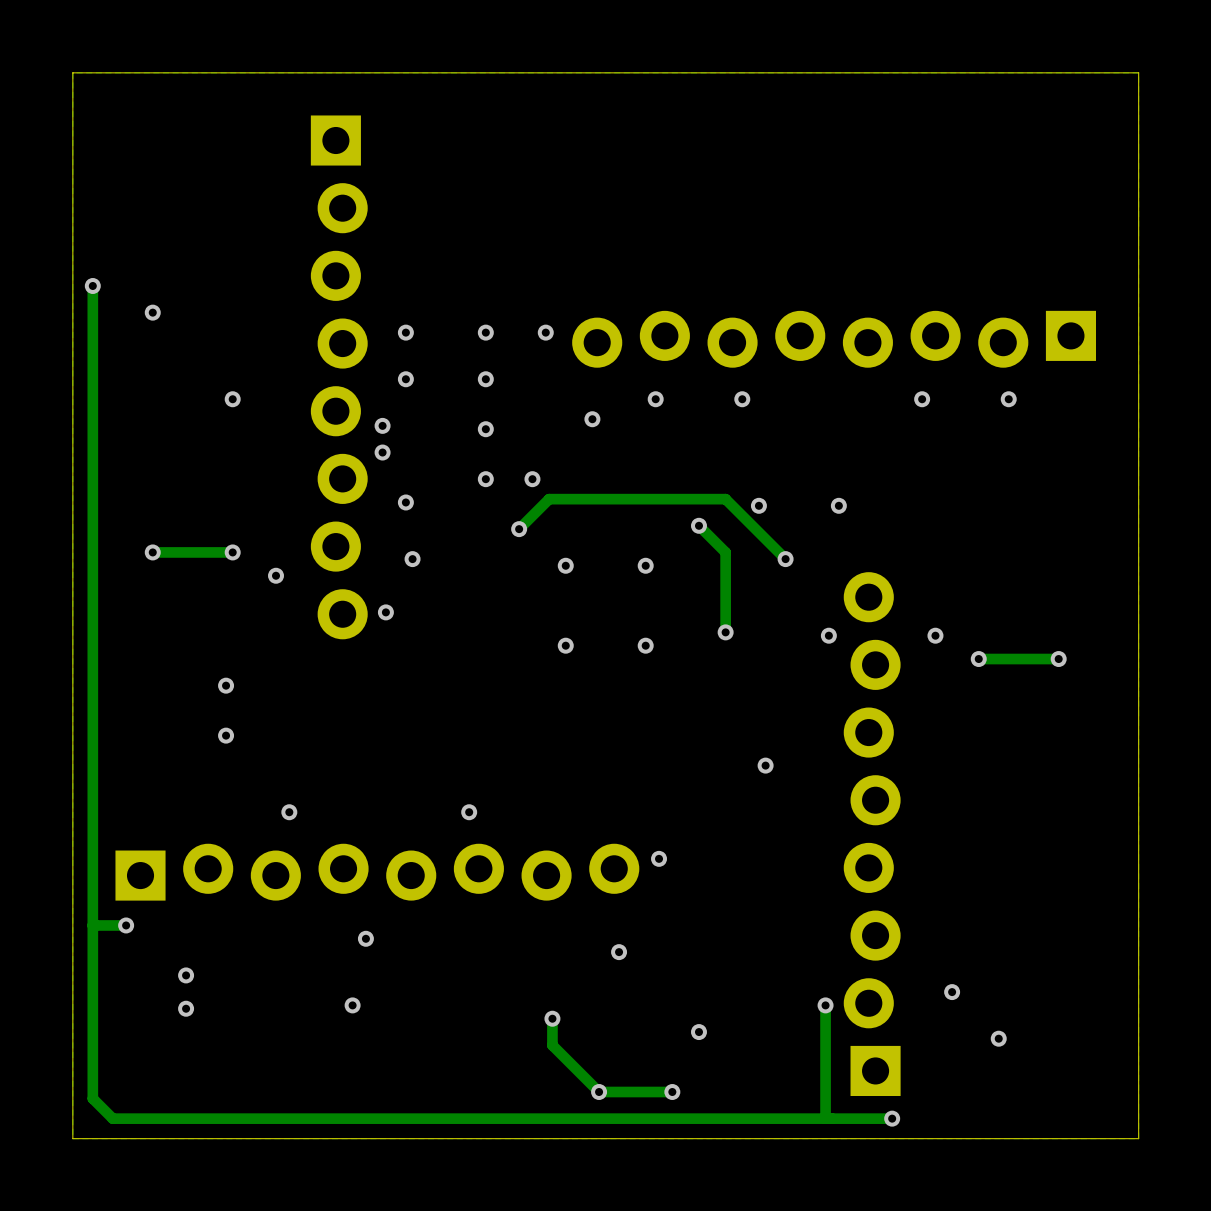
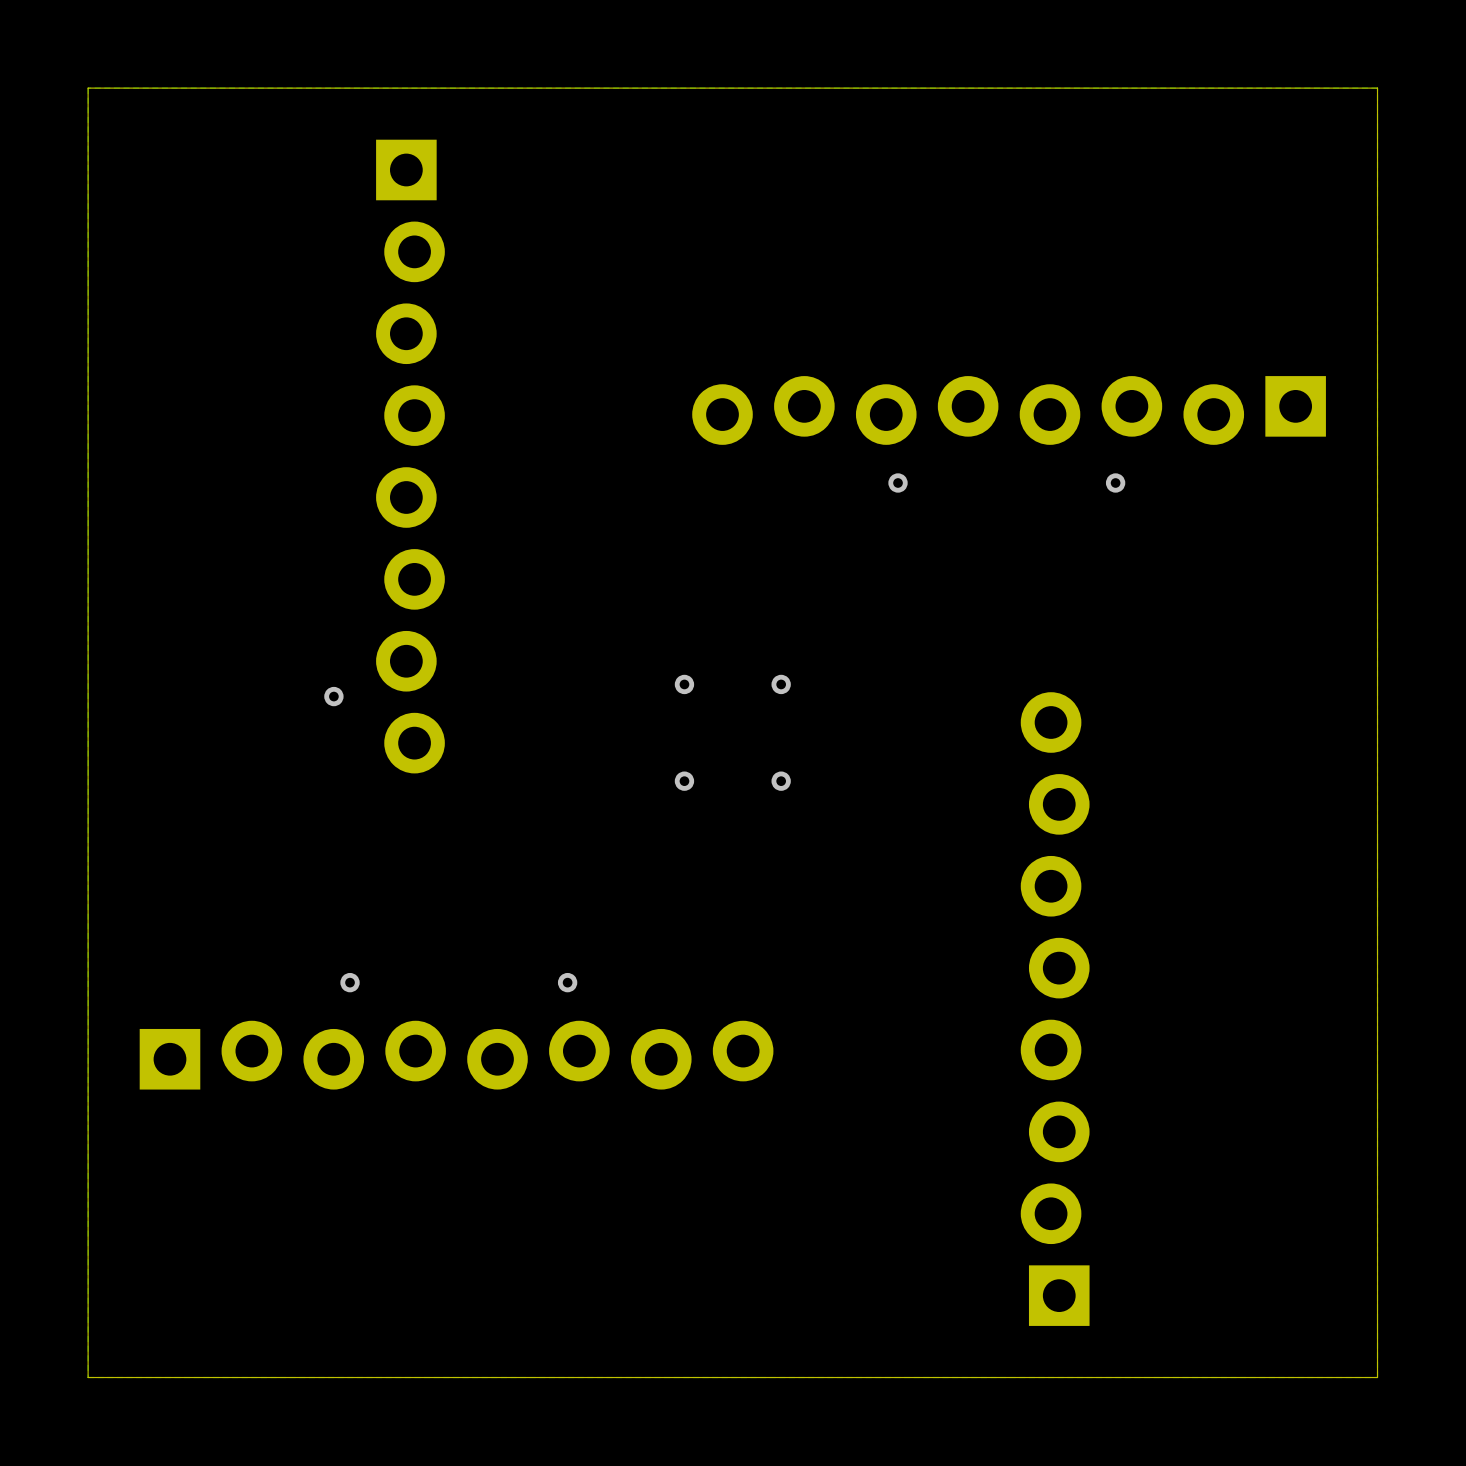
track: (92, 285) (92, 1098) (112, 1118) (892, 1118) -> none
via: (92, 285) -> none
via: (152, 312) -> none
via: (405, 332) -> none
via: (485, 332) -> none
via: (545, 332) -> none
via: (405, 379) -> none
via: (485, 379) -> none
via: (232, 399) -> none
via: (655, 399) -> none
via: (1008, 399) -> none
via: (592, 419) -> none
via: (382, 425) -> none
via: (485, 429) -> none
via: (382, 452) -> none
via: (485, 479) -> none
via: (532, 479) -> none
via: (405, 502) -> none
via: (758, 505) -> none
via: (838, 505) -> none
track: (698, 525) (725, 552) (725, 632) -> none
via: (698, 525) -> none
track: (519, 529) (549, 499) (725, 499) (785, 559) -> none
via: (519, 529) -> none
via: (152, 552) -> none
track: (232, 552) (152, 552) -> none
via: (232, 552) -> none
via: (412, 559) -> none
via: (785, 559) -> none
via: (385, 612) -> none
via: (725, 632) -> none
via: (828, 635) -> none
via: (935, 635) -> none
via: (978, 659) -> none
track: (1058, 659) (978, 659) -> none
via: (1058, 659) -> none
via: (226, 685) -> none
via: (226, 735) -> none
via: (765, 765) -> none
via: (659, 858) -> none
track: (126, 925) (92, 925) -> none
via: (126, 925) -> none
via: (365, 938) -> none
via: (619, 952) -> none
via: (186, 975) -> none
via: (952, 992) -> none
via: (352, 1005) -> none
track: (825, 1005) (825, 1118) -> none
via: (825, 1005) -> none
via: (186, 1008) -> none
track: (552, 1018) (552, 1045) (599, 1092) (672, 1092) -> none
via: (552, 1018) -> none
via: (698, 1032) -> none
via: (998, 1038) -> none
via: (599, 1092) -> none
via: (672, 1092) -> none
via: (892, 1118) -> none

